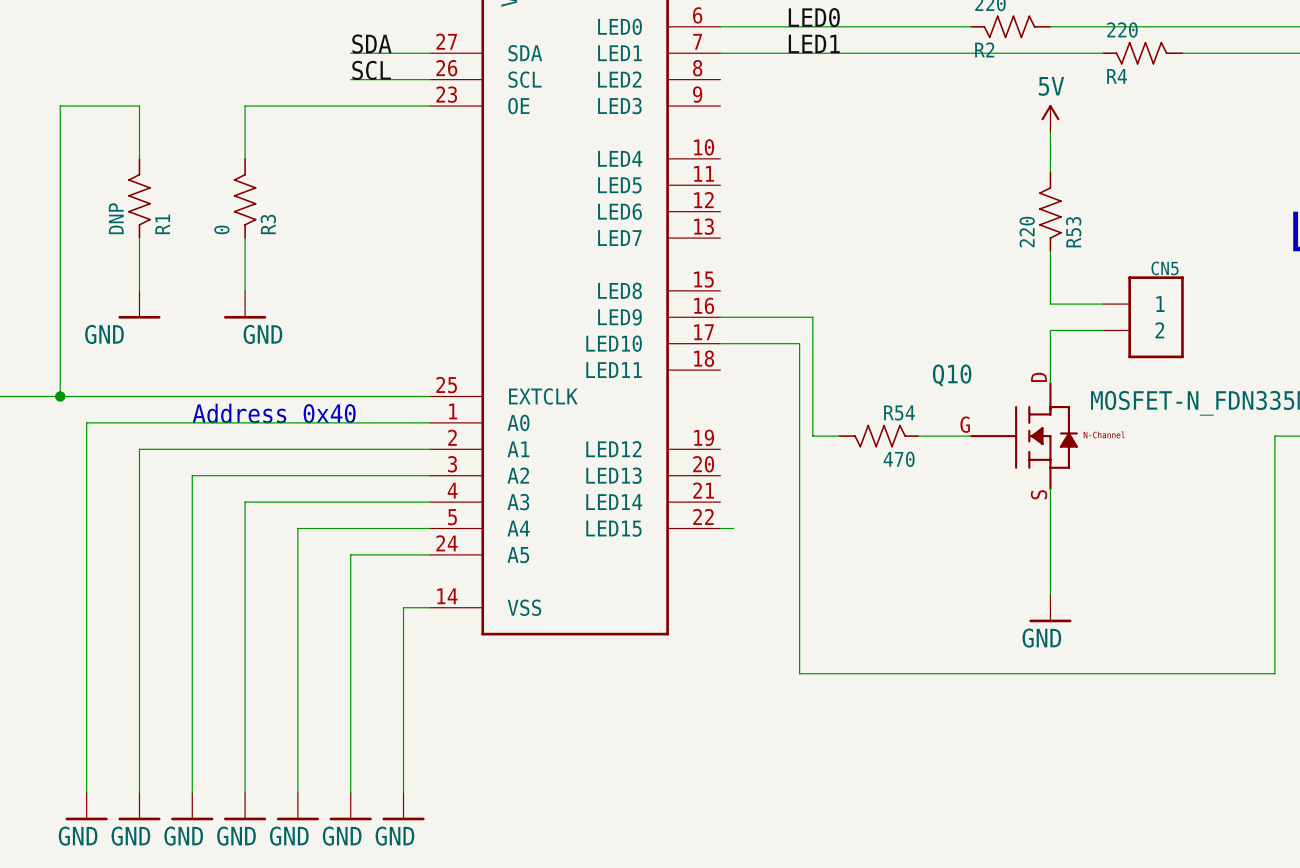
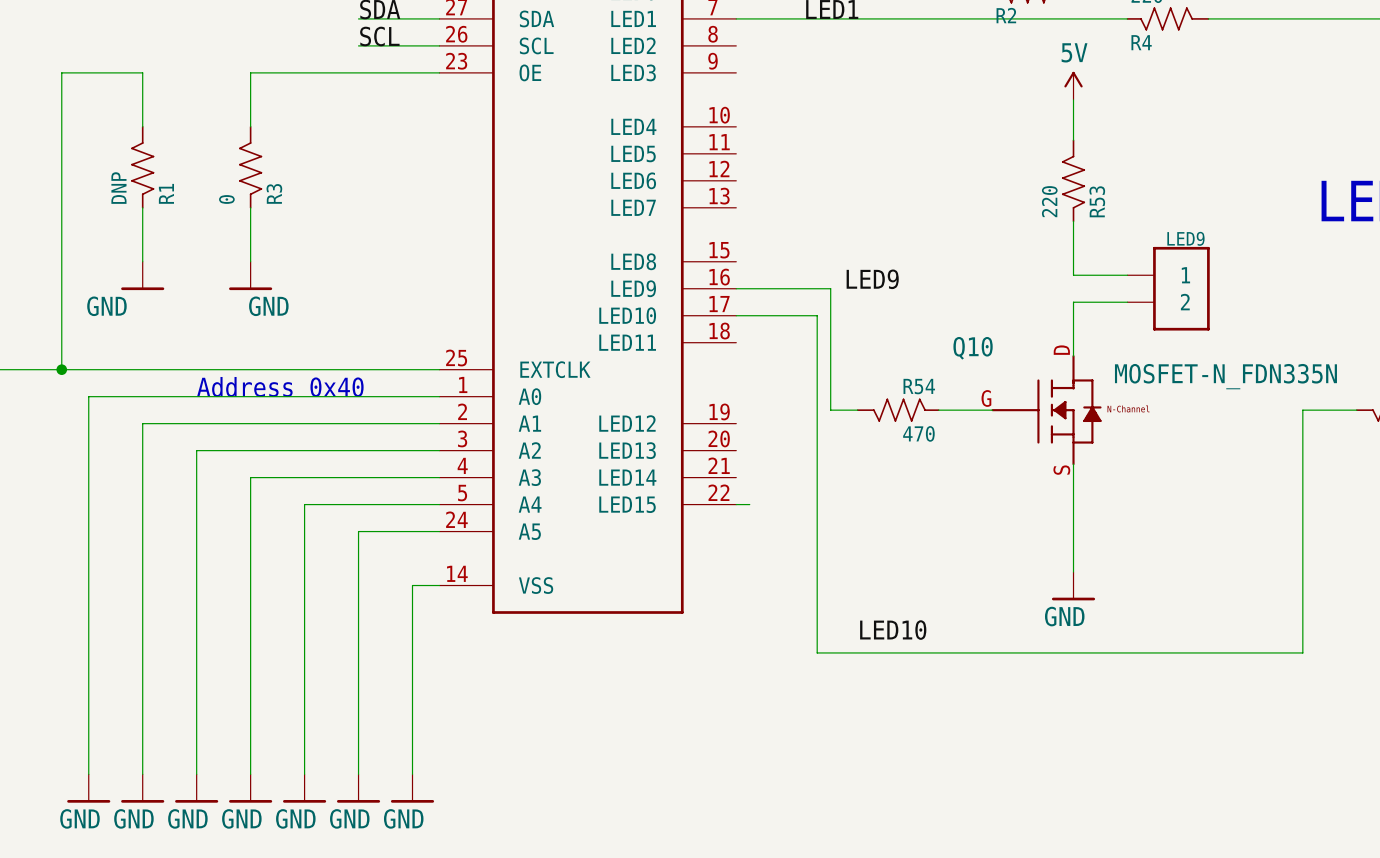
CN5 name: CN5 (1165, 268) -> LED9 (1185, 238)
label: none -> LED9 (872, 279)
label: none -> LED10 (893, 630)

